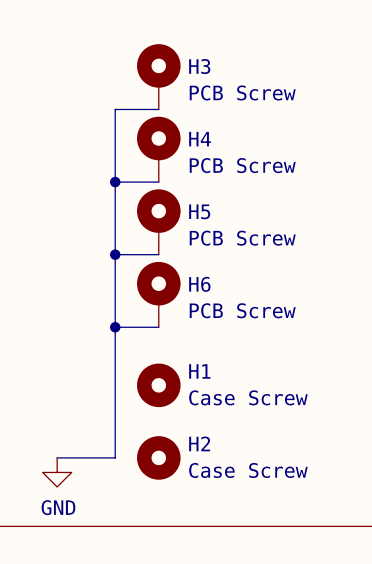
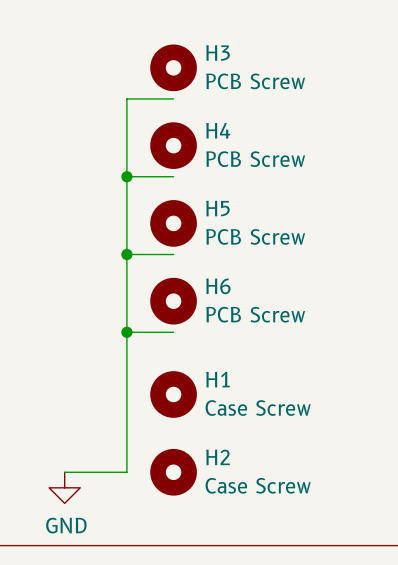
H3 symbol: [137, 44, 181, 110] -> [150, 44, 197, 92]
H4 symbol: [137, 116, 181, 183] -> [150, 122, 197, 169]
H5 symbol: [137, 189, 181, 255] -> [150, 200, 197, 247]
H6 symbol: [137, 261, 181, 328] -> [150, 277, 197, 325]

